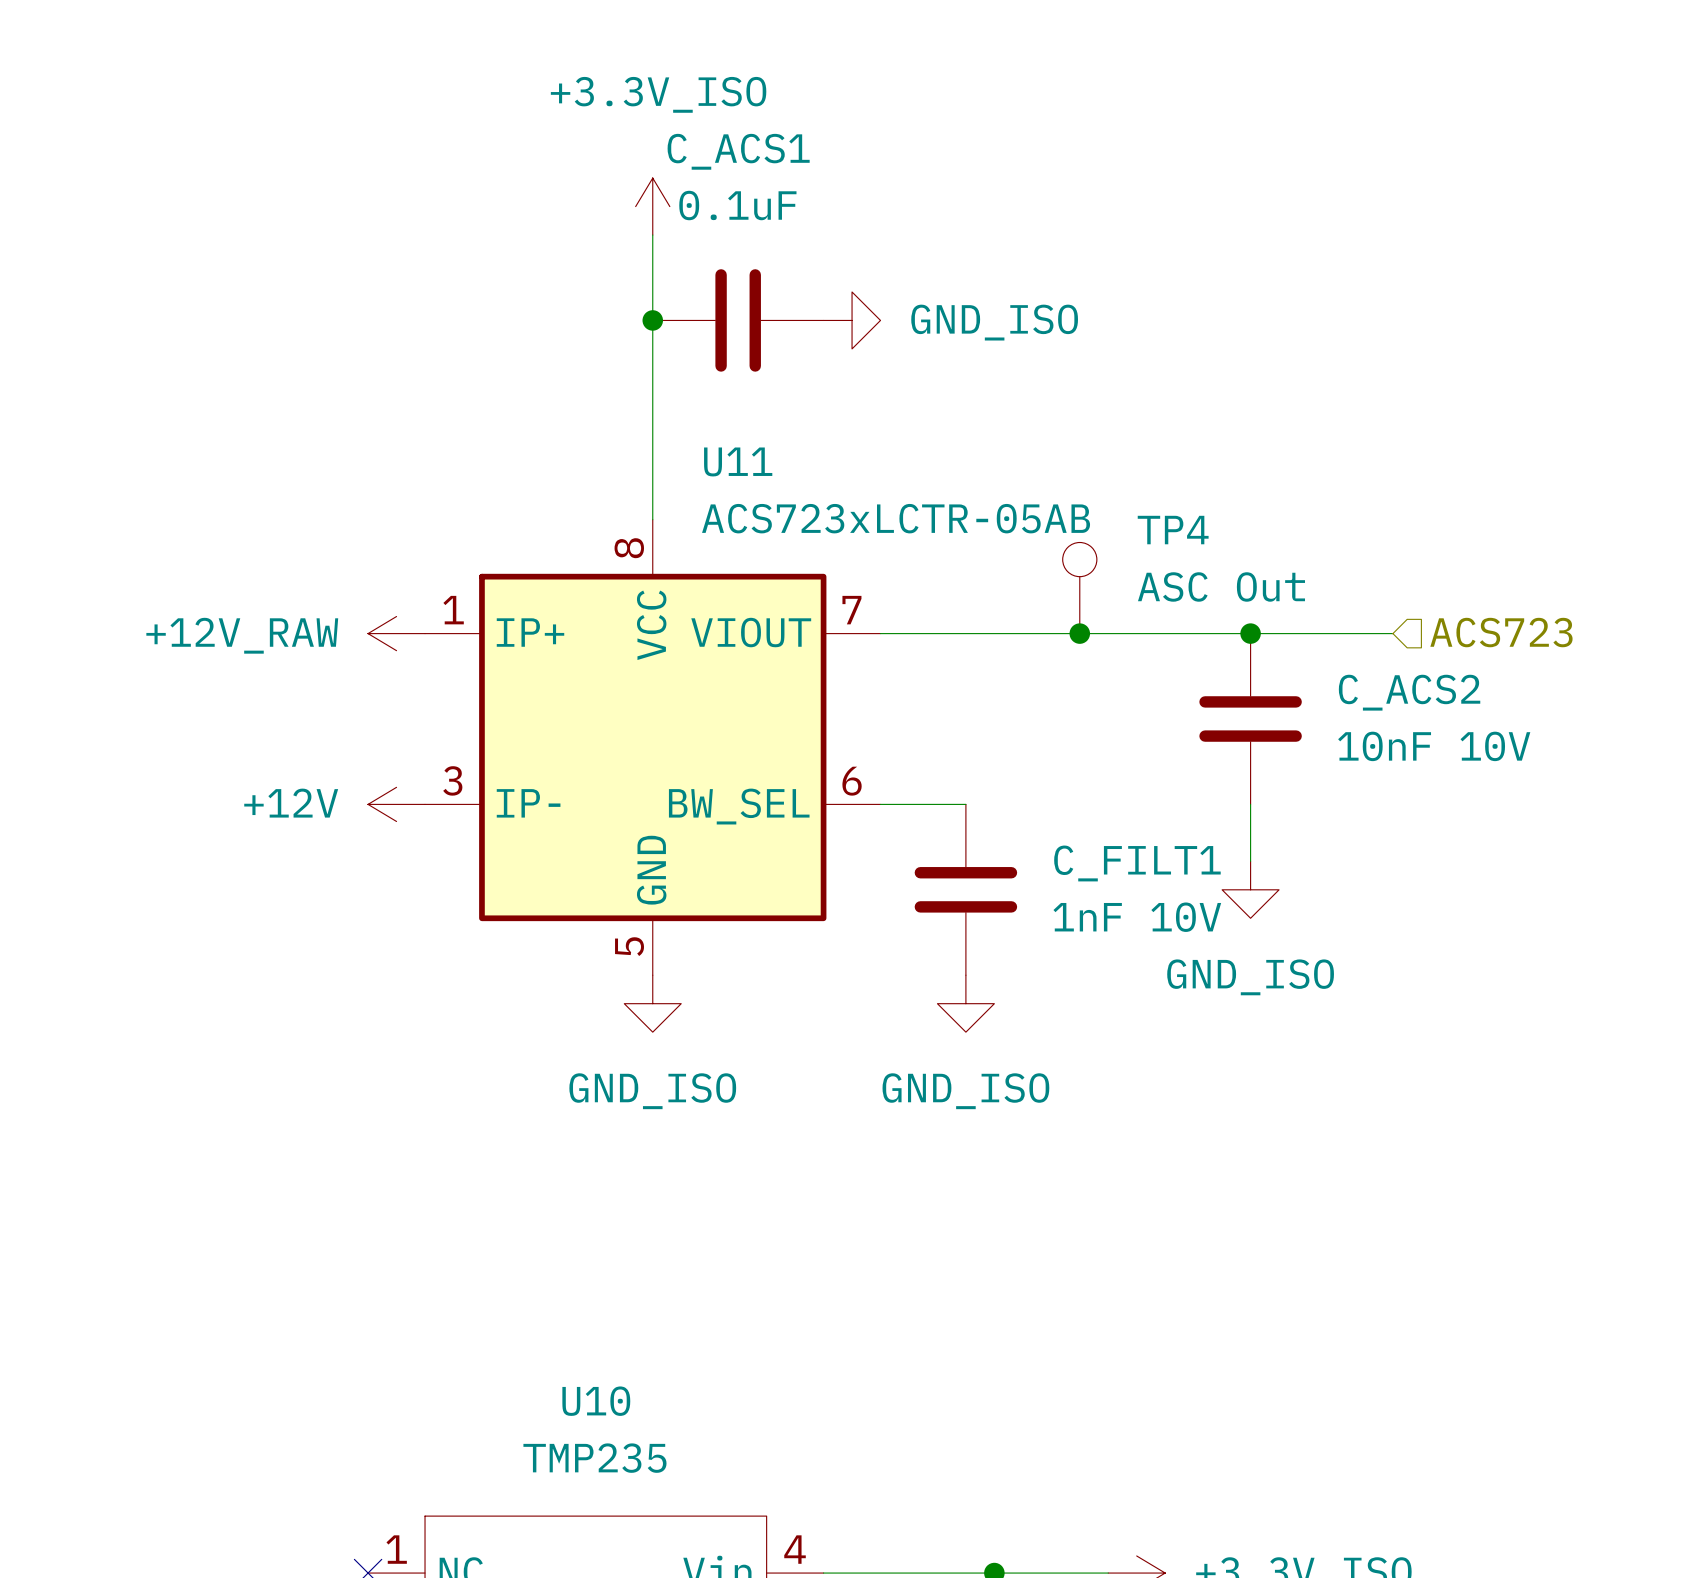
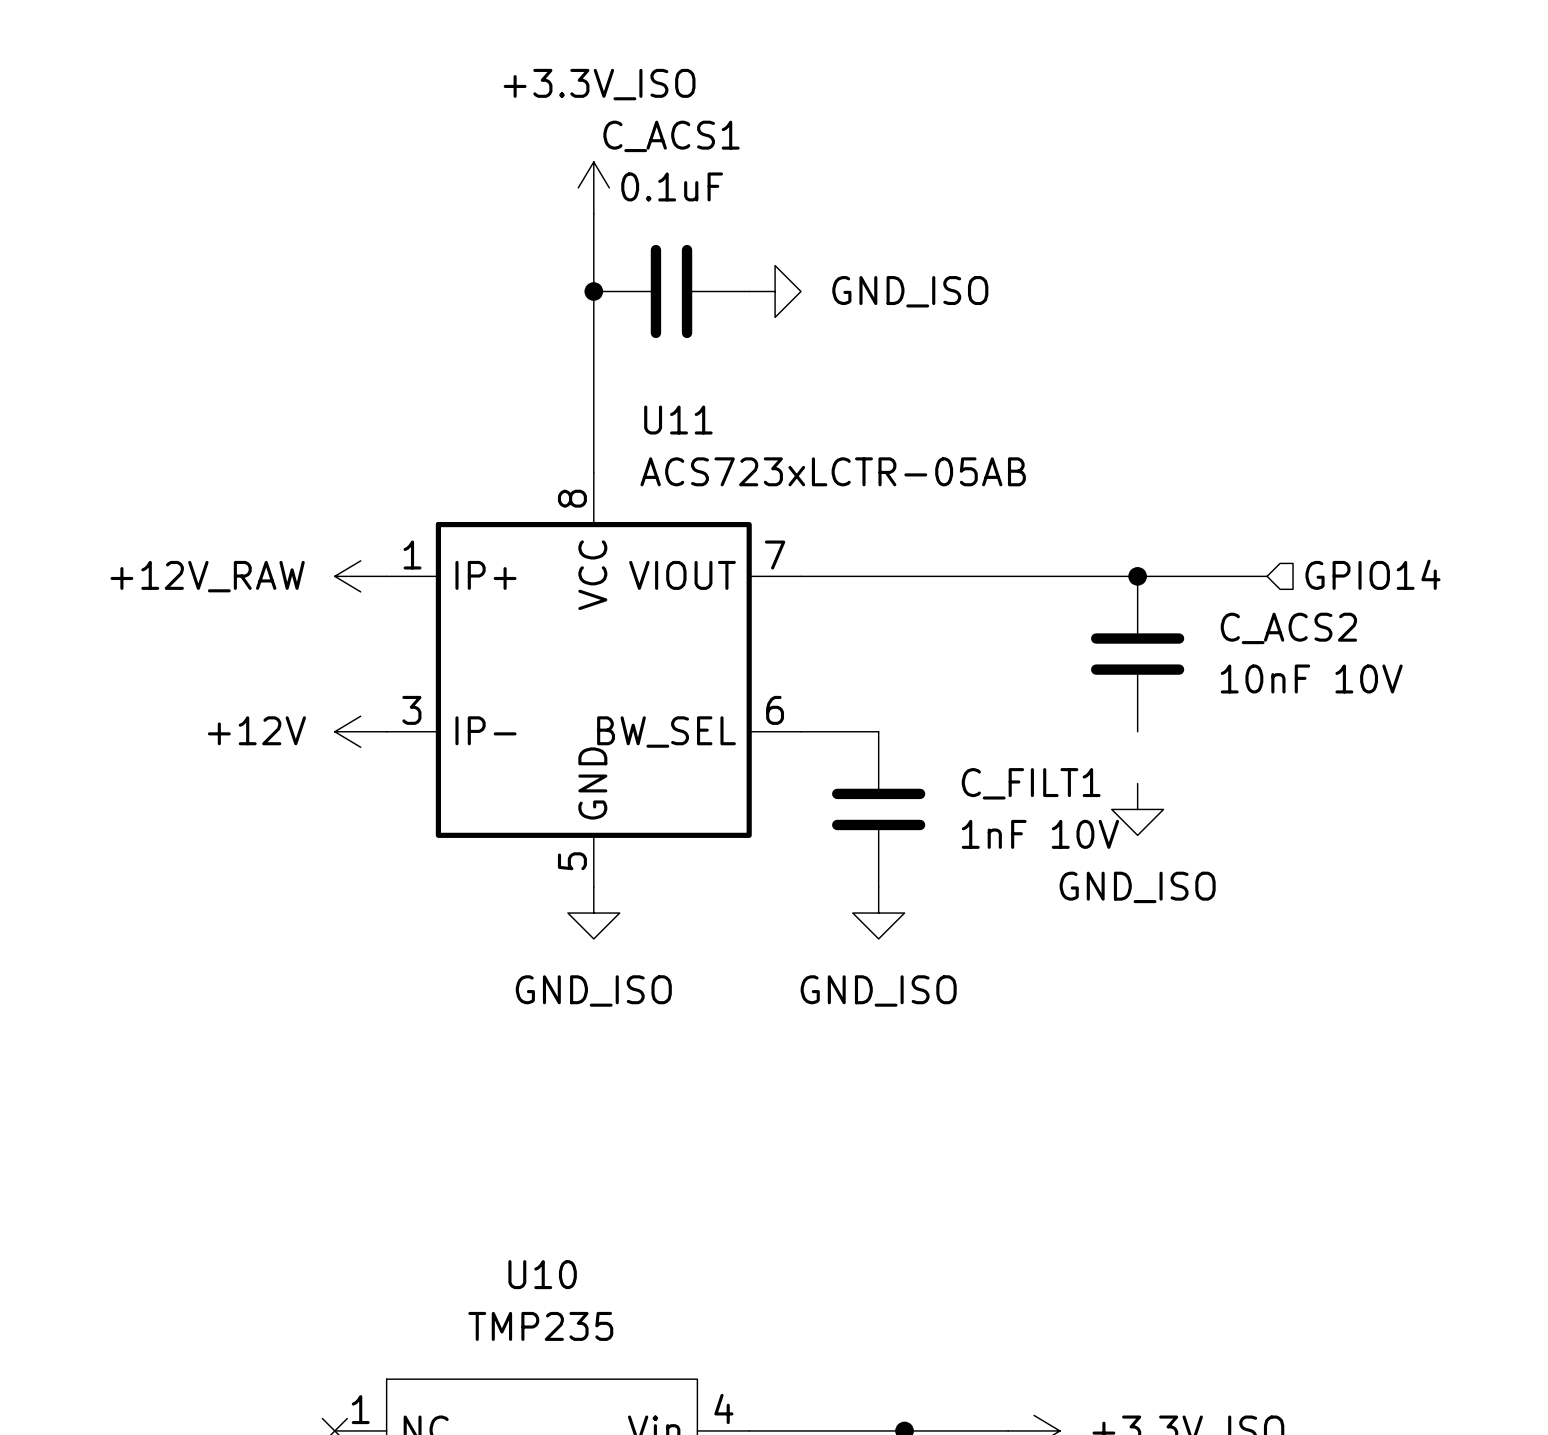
TP4: ASC Out (1079, 588) -> none
hierarchical label: ACS723 (1501, 632) -> GPIO14 (1372, 574)
junction: (1079, 633) -> none
wire: (1250, 804) (1250, 861) -> none

